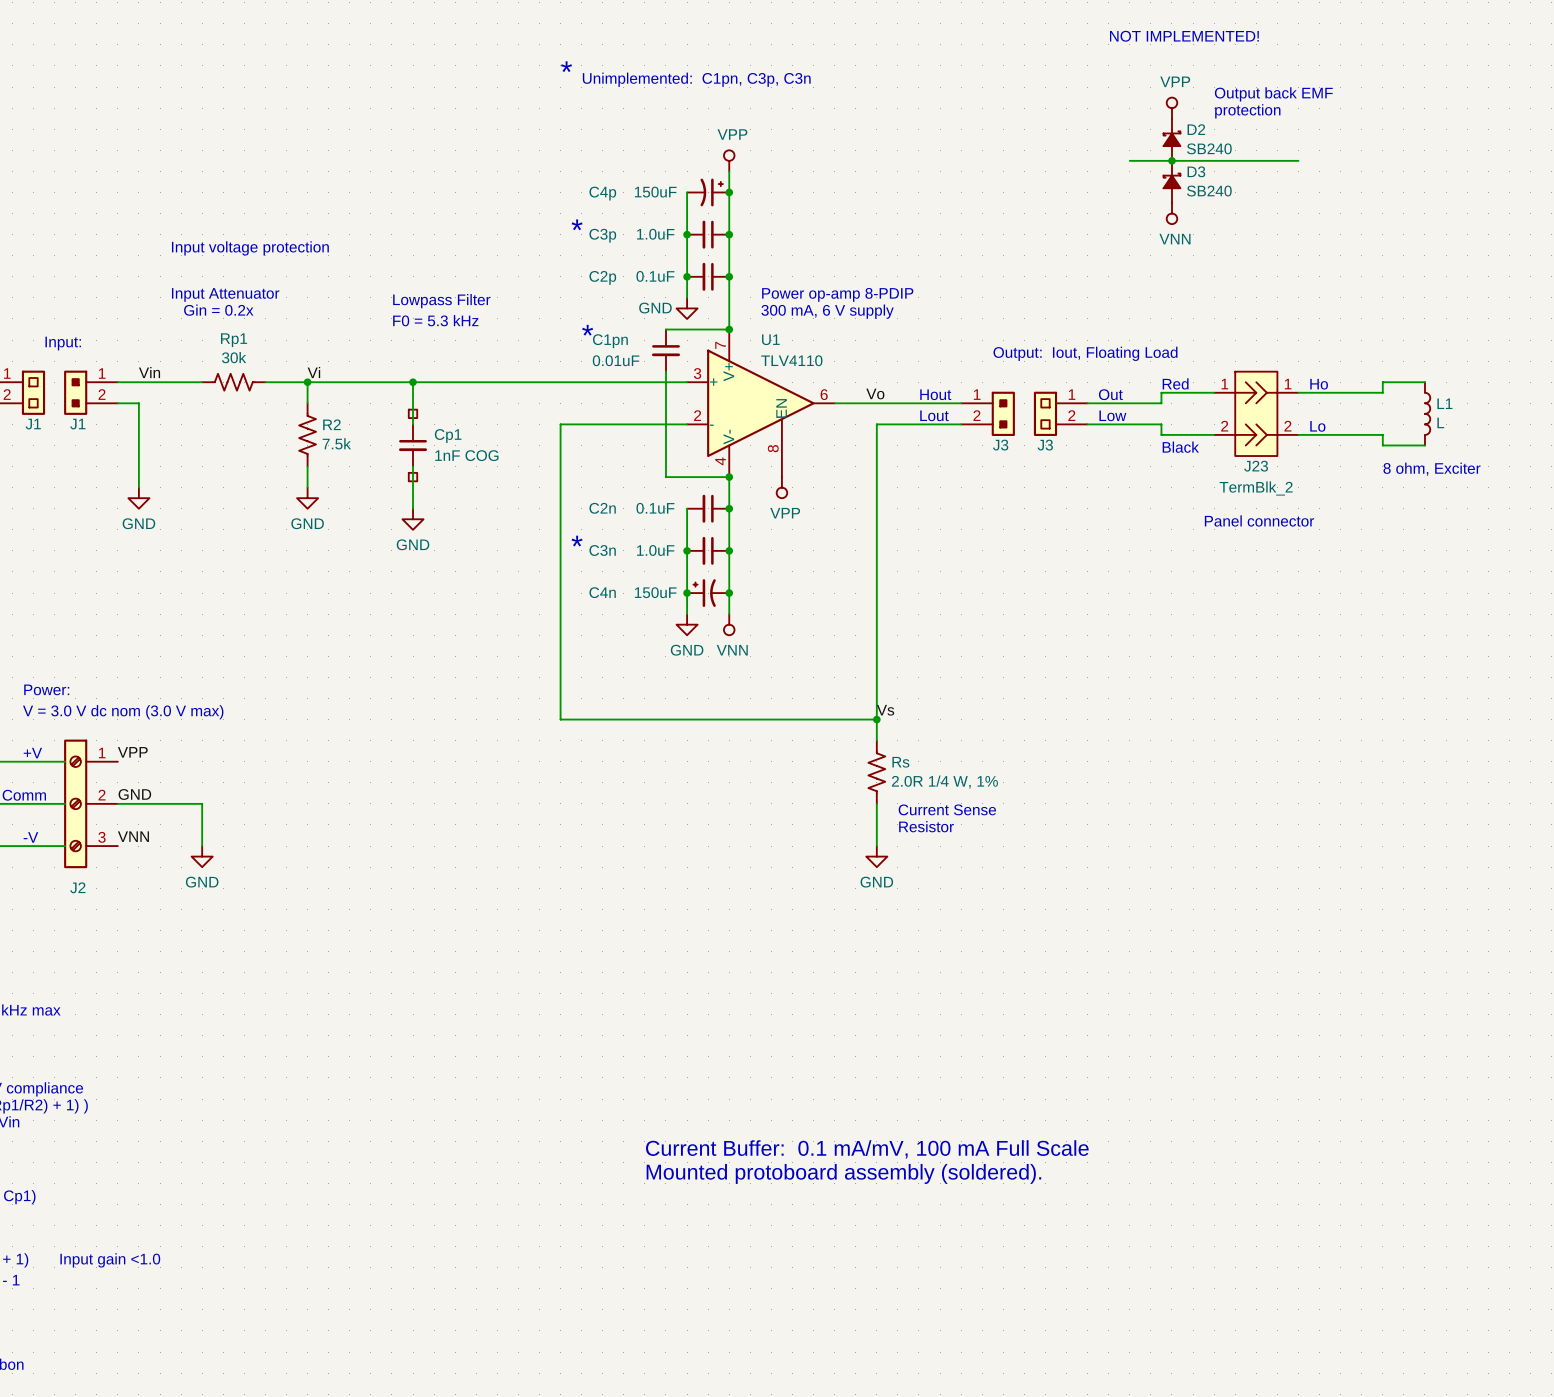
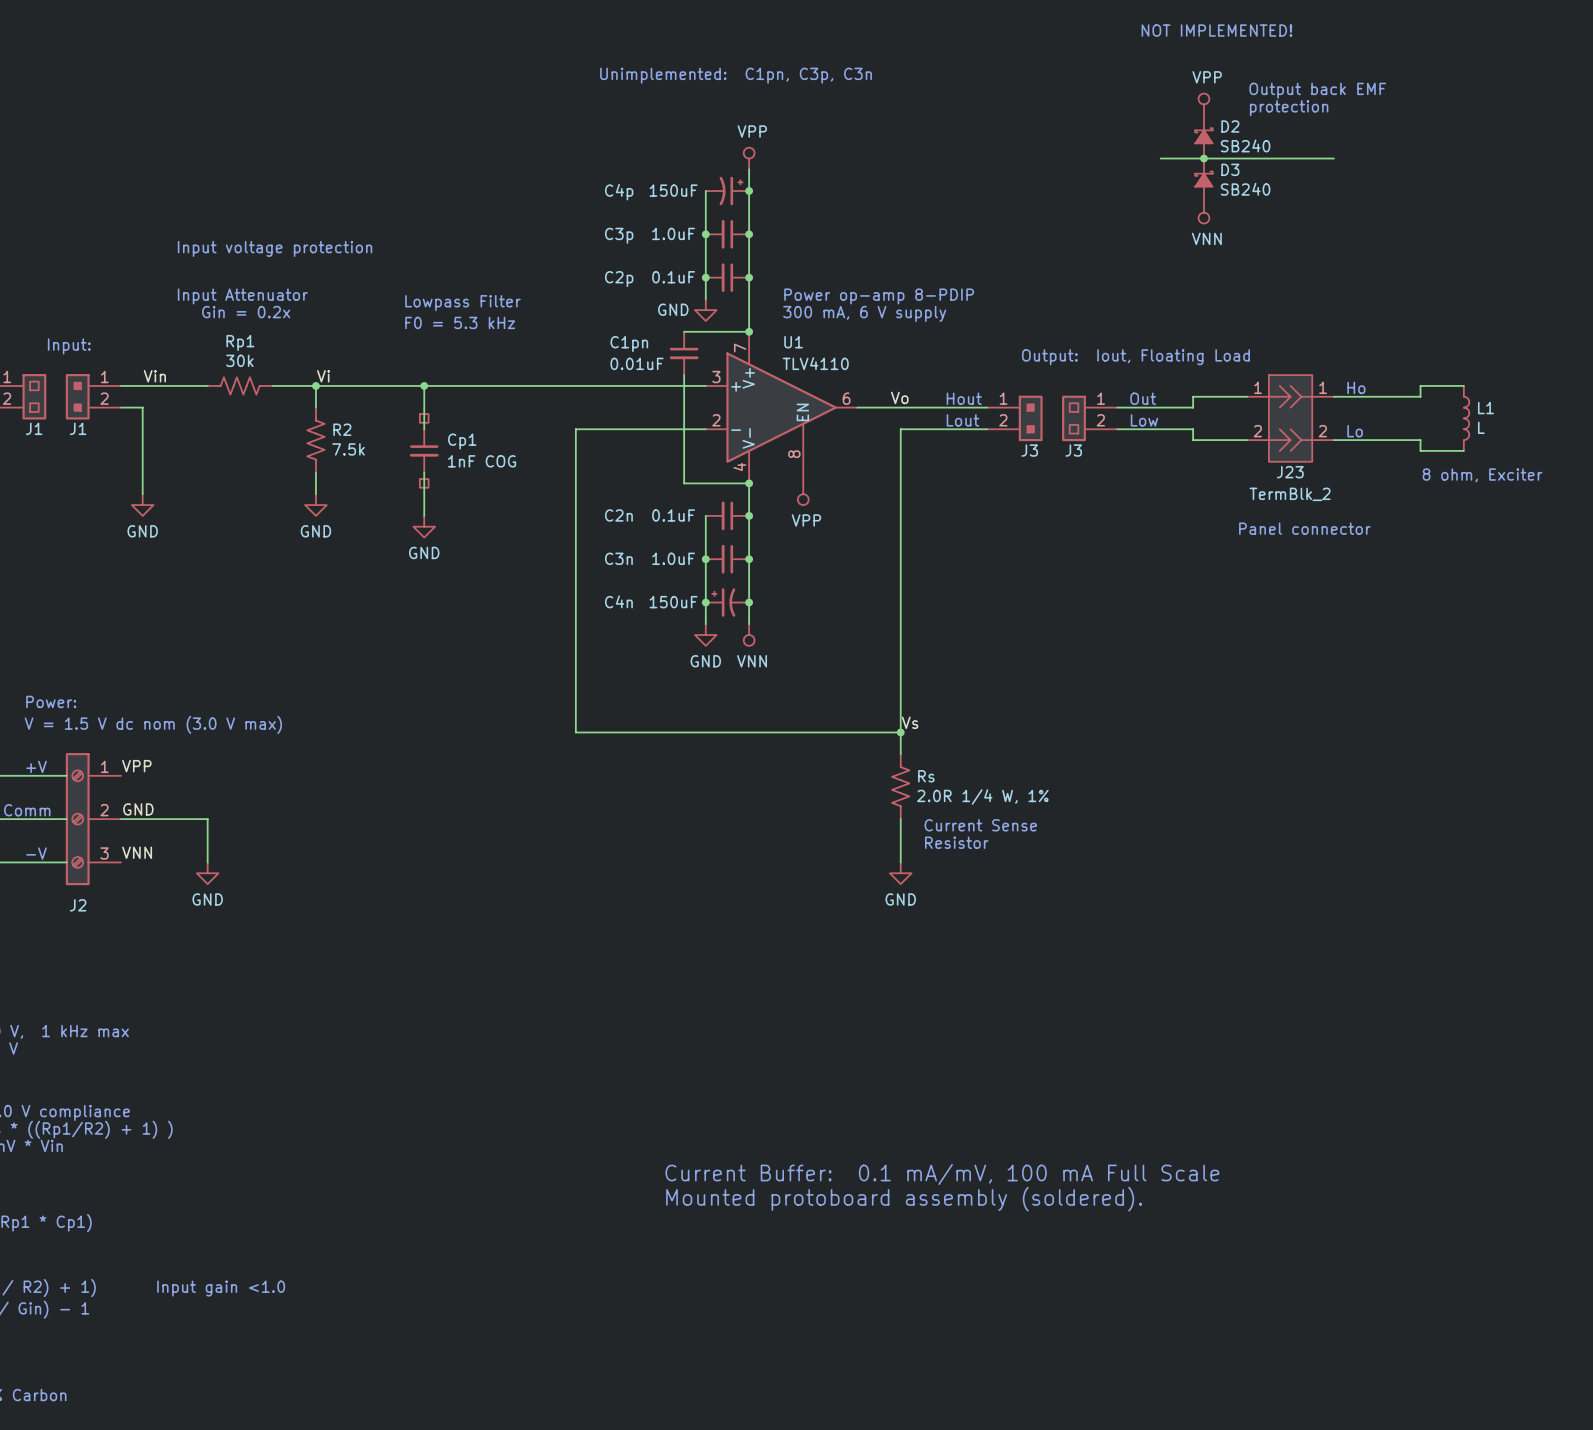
text: * (566, 66) -> none
text: * (577, 224) -> none
text: * (587, 330) -> none
text: Red (1175, 383) -> none
text: Black (1180, 447) -> none
text: * (577, 541) -> none
text: V = 3.0 V dc nom (3.0 V max) (123, 712) -> V = 1.5 V dc nom (3.0 V max) (153, 724)

